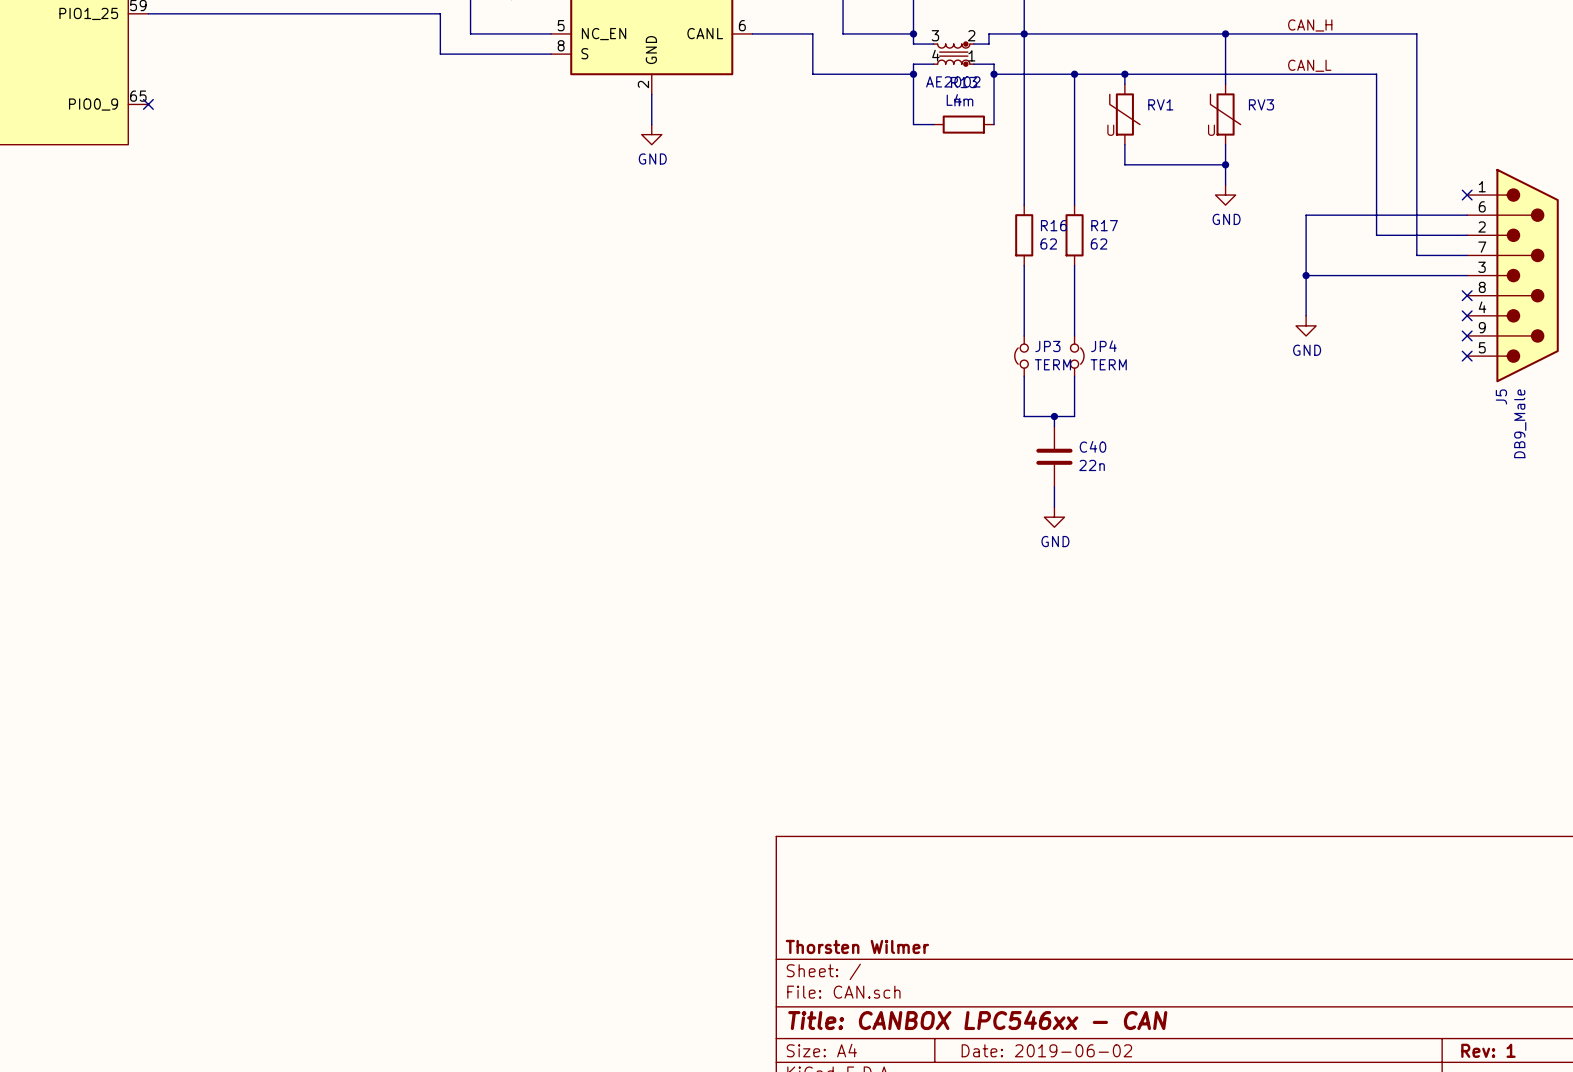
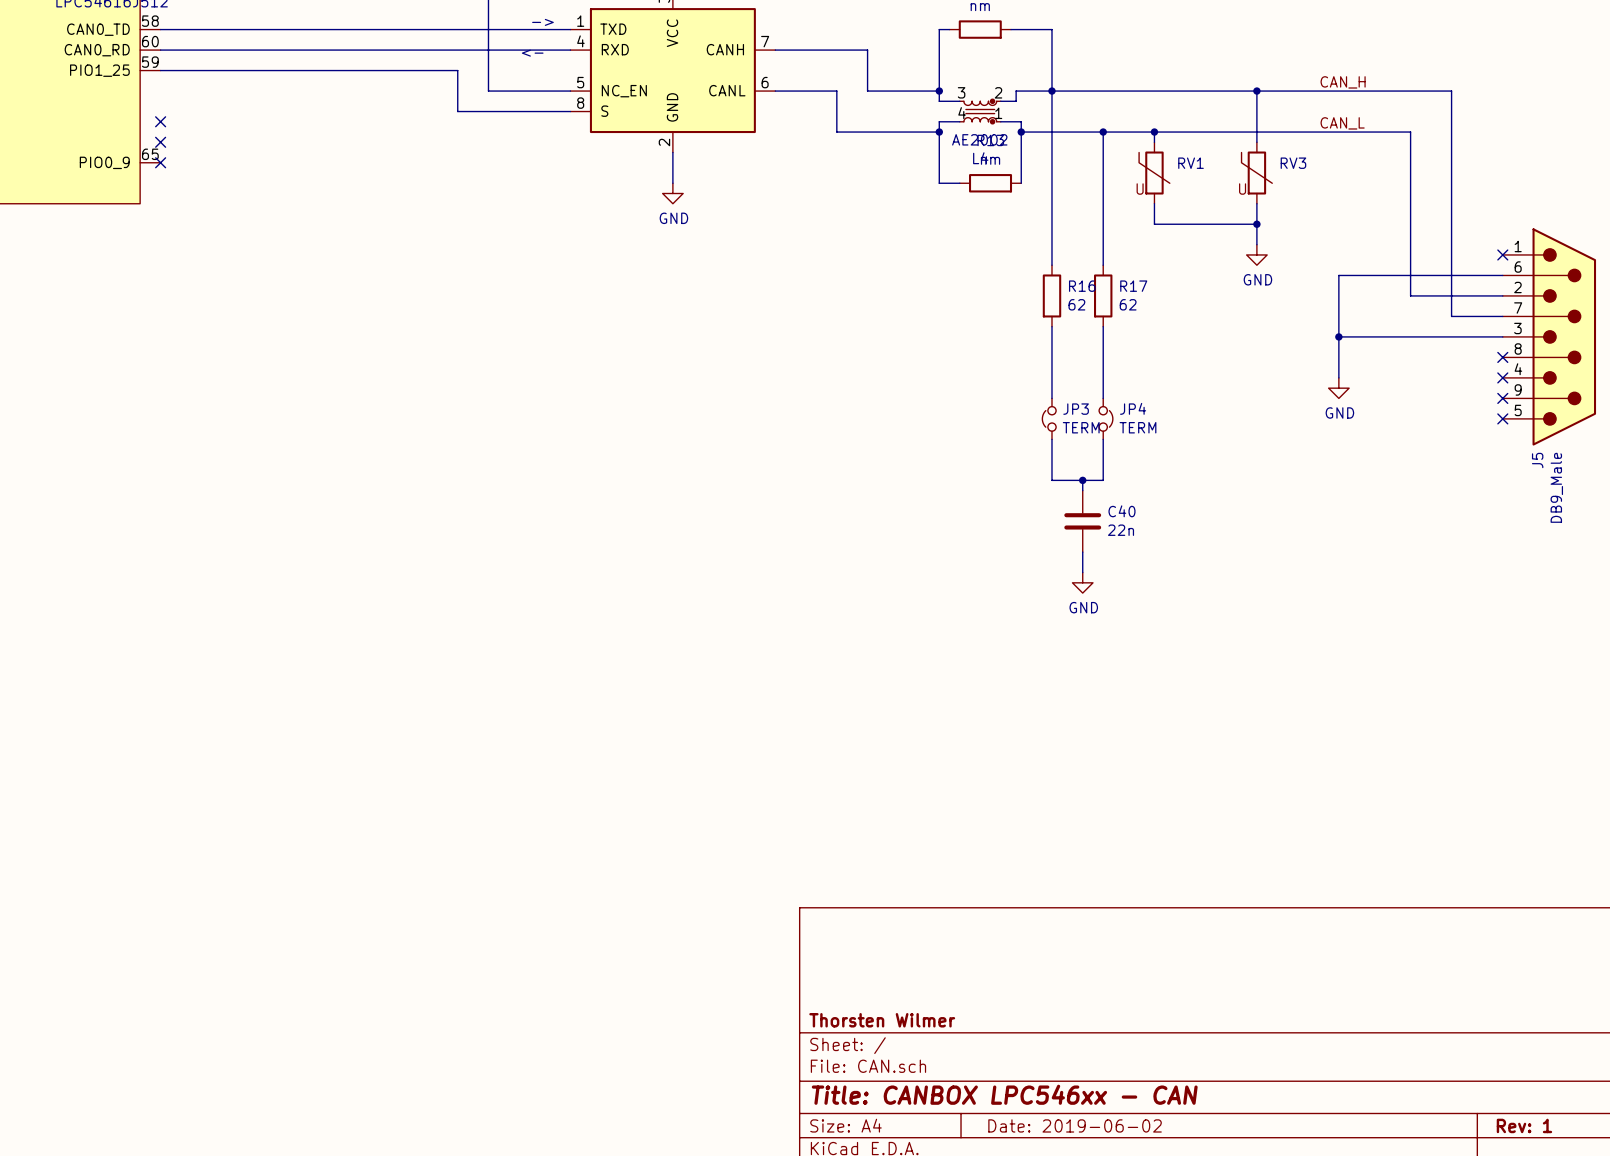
no-connect mark: none -> (160, 121)
no-connect mark: none -> (160, 142)

